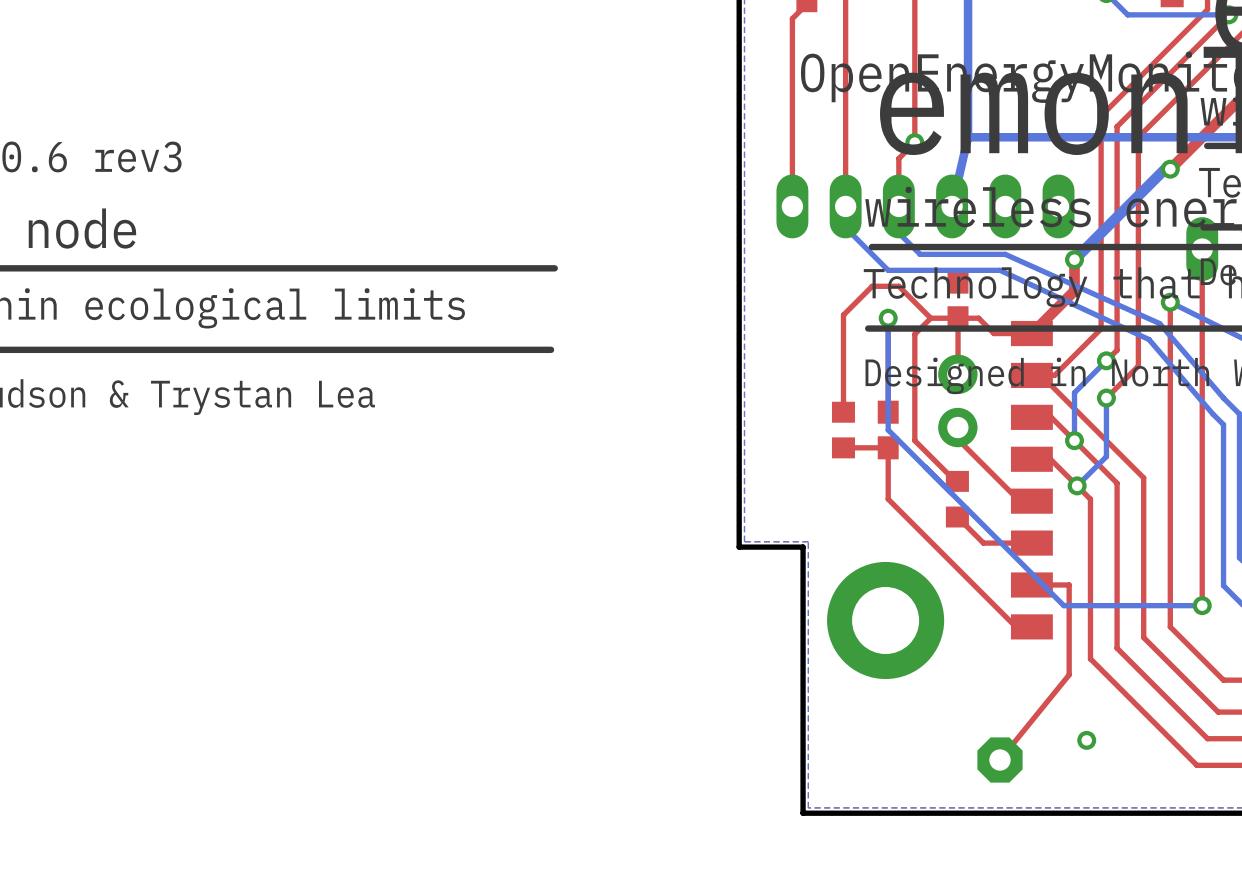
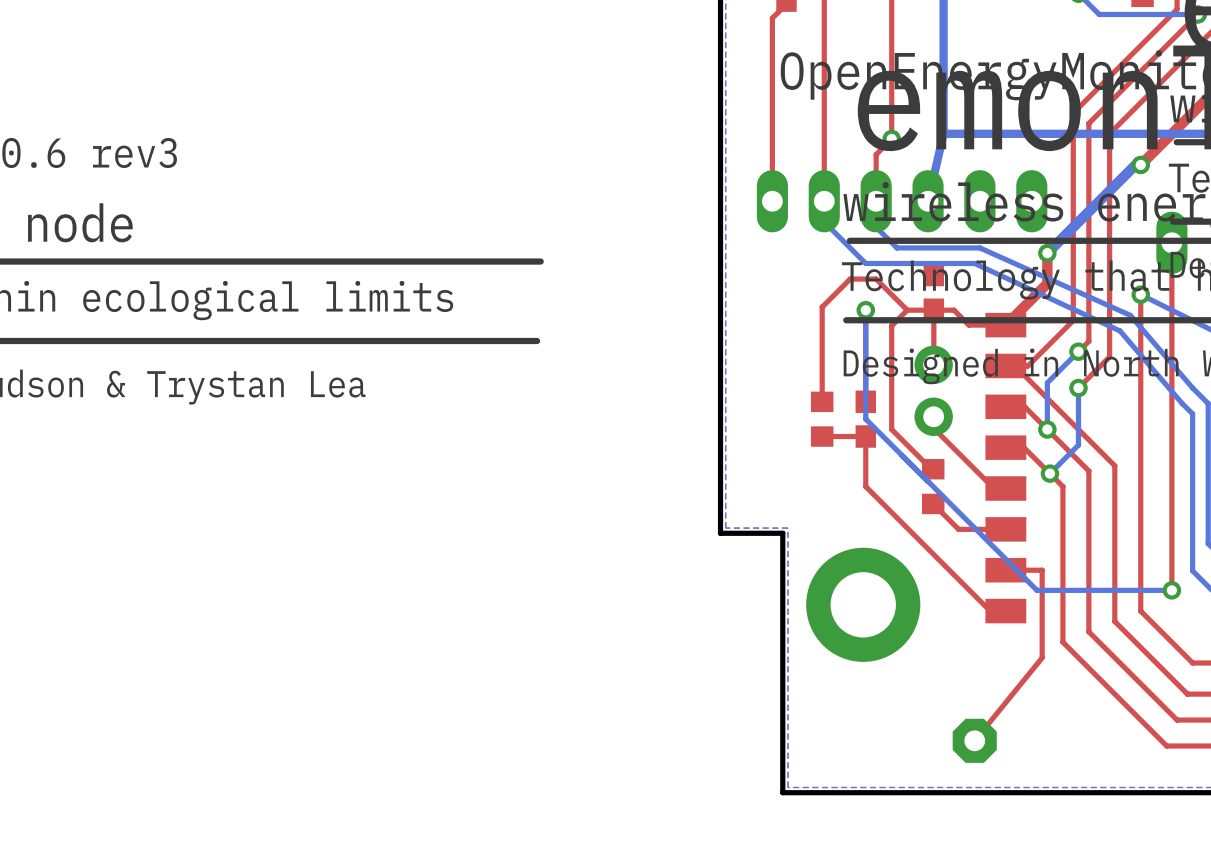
via: (1086, 740) -> none

